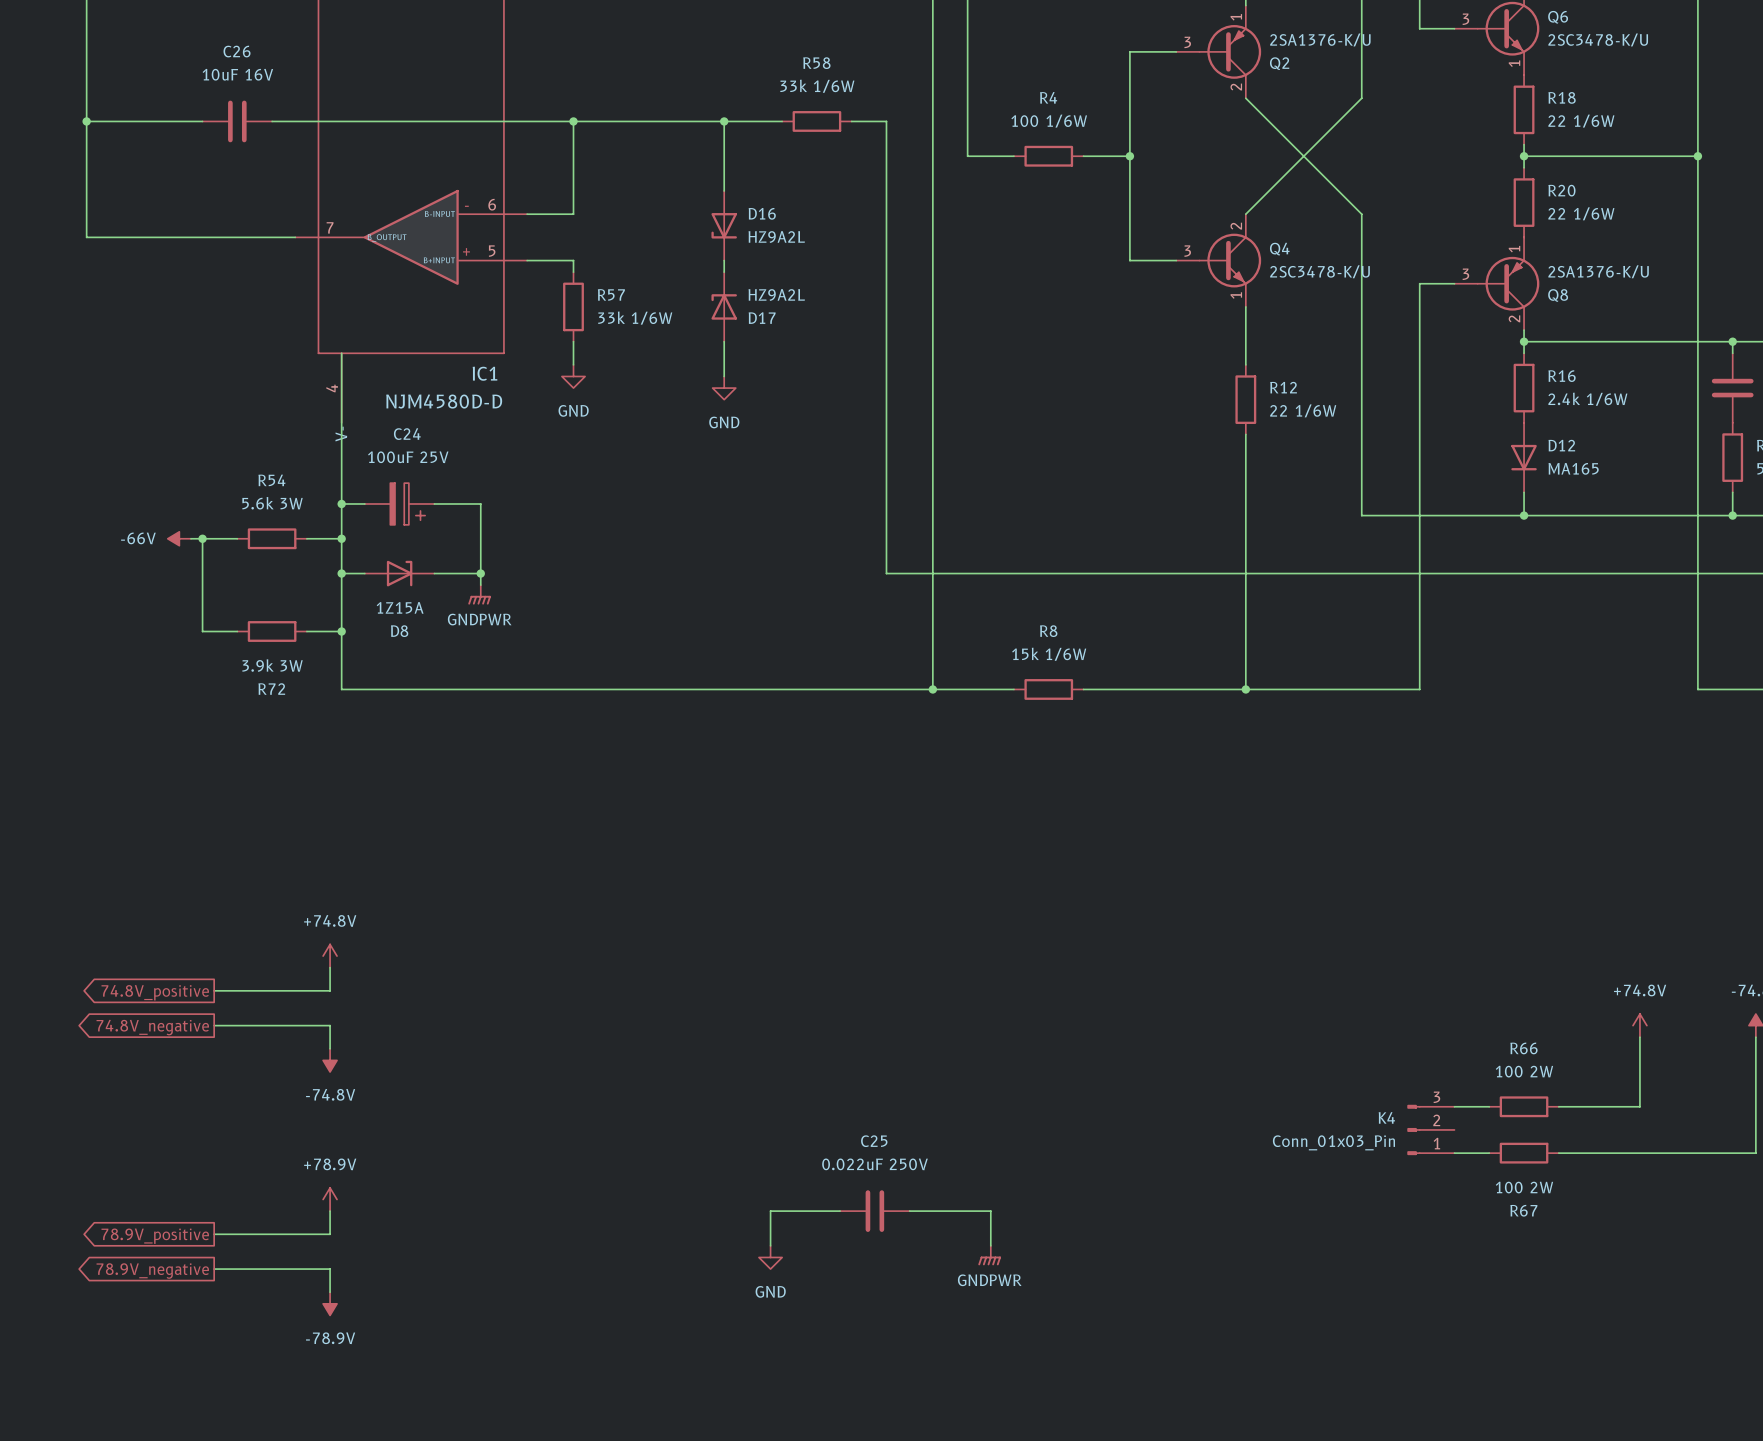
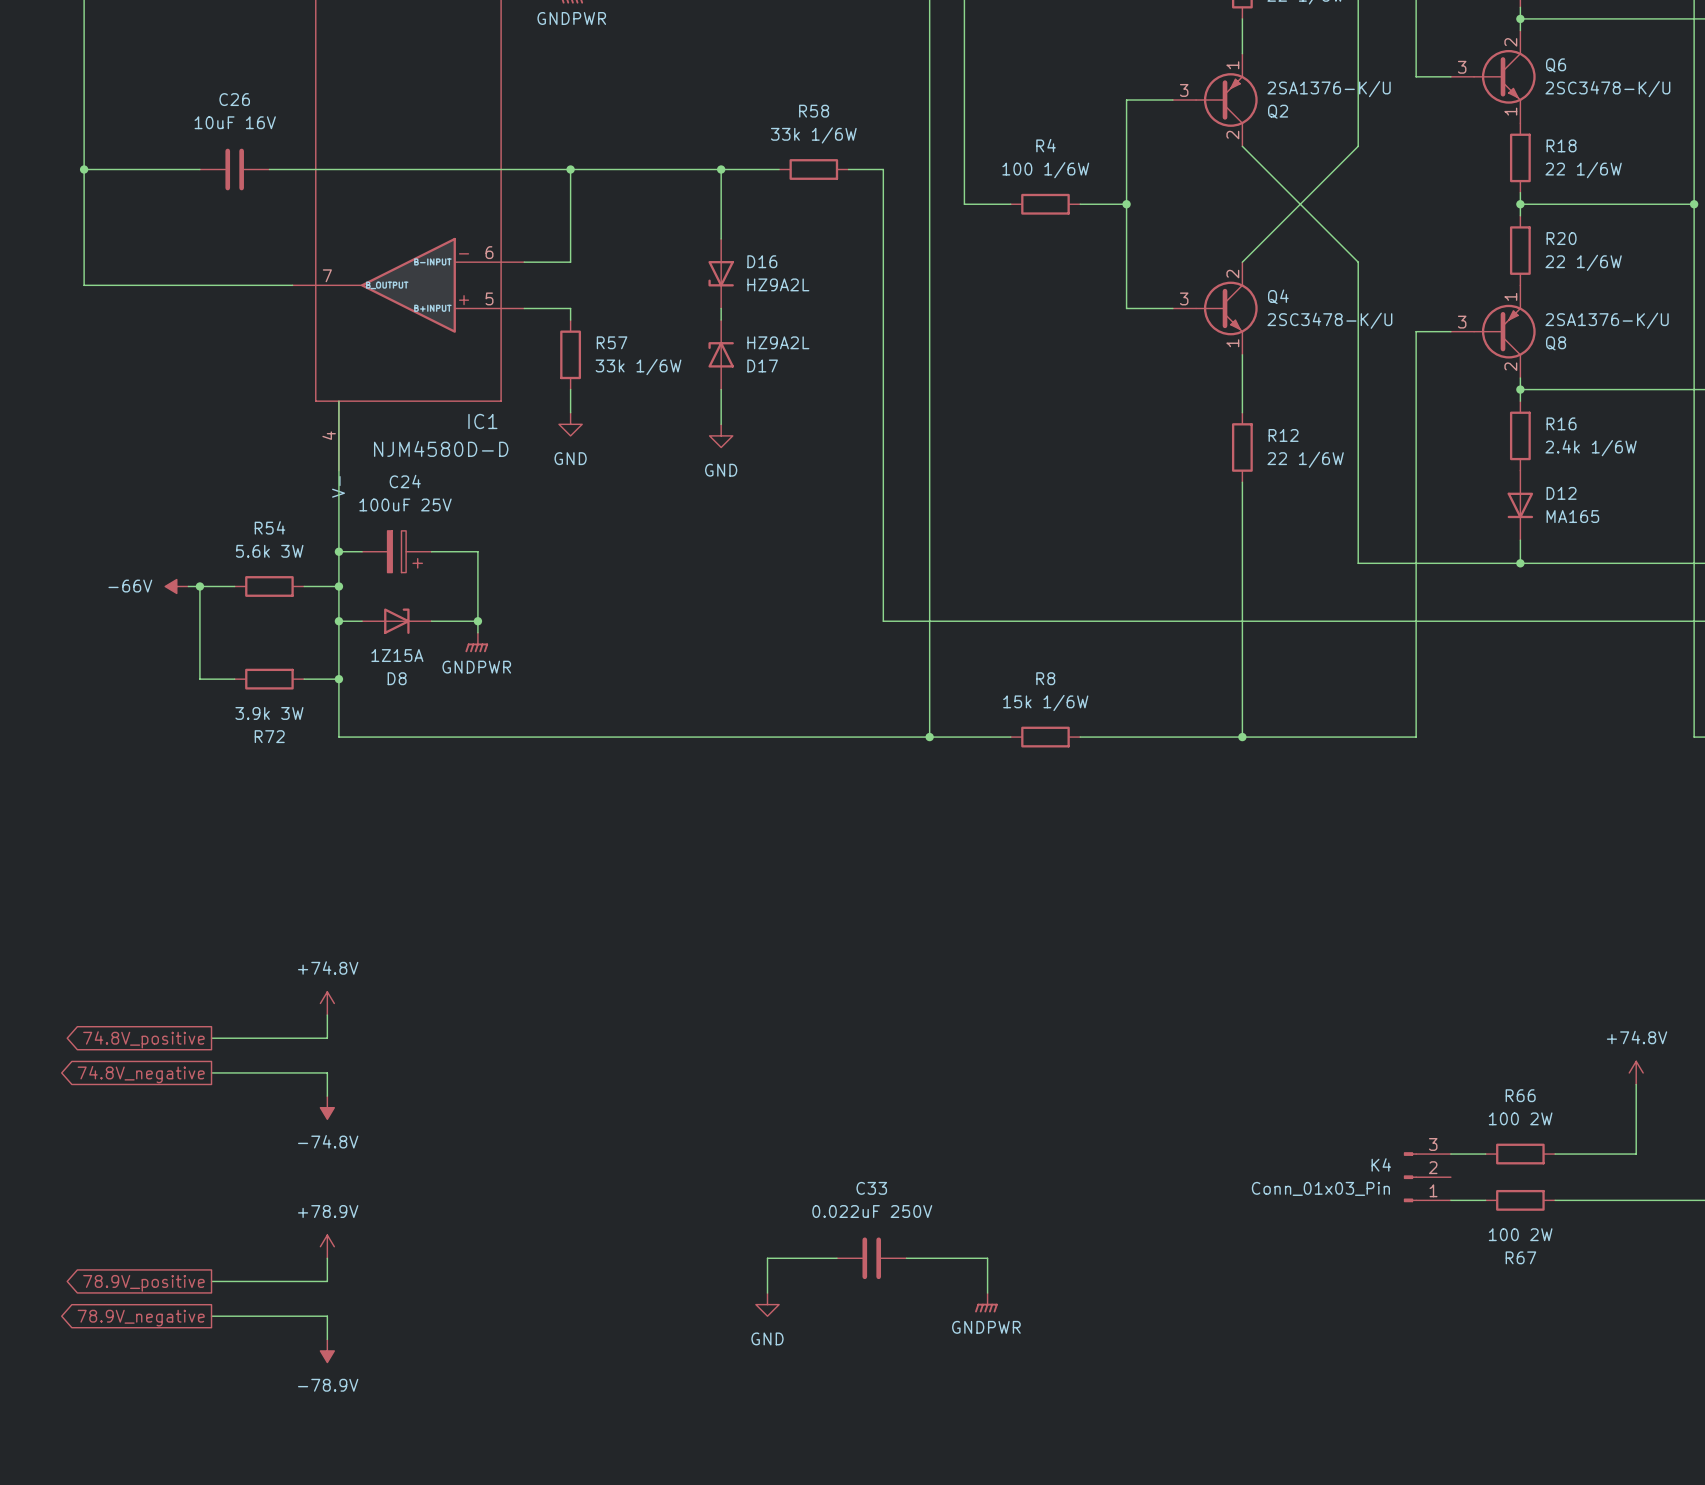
C25 name: C25 (874, 1141) -> C33 (871, 1188)

